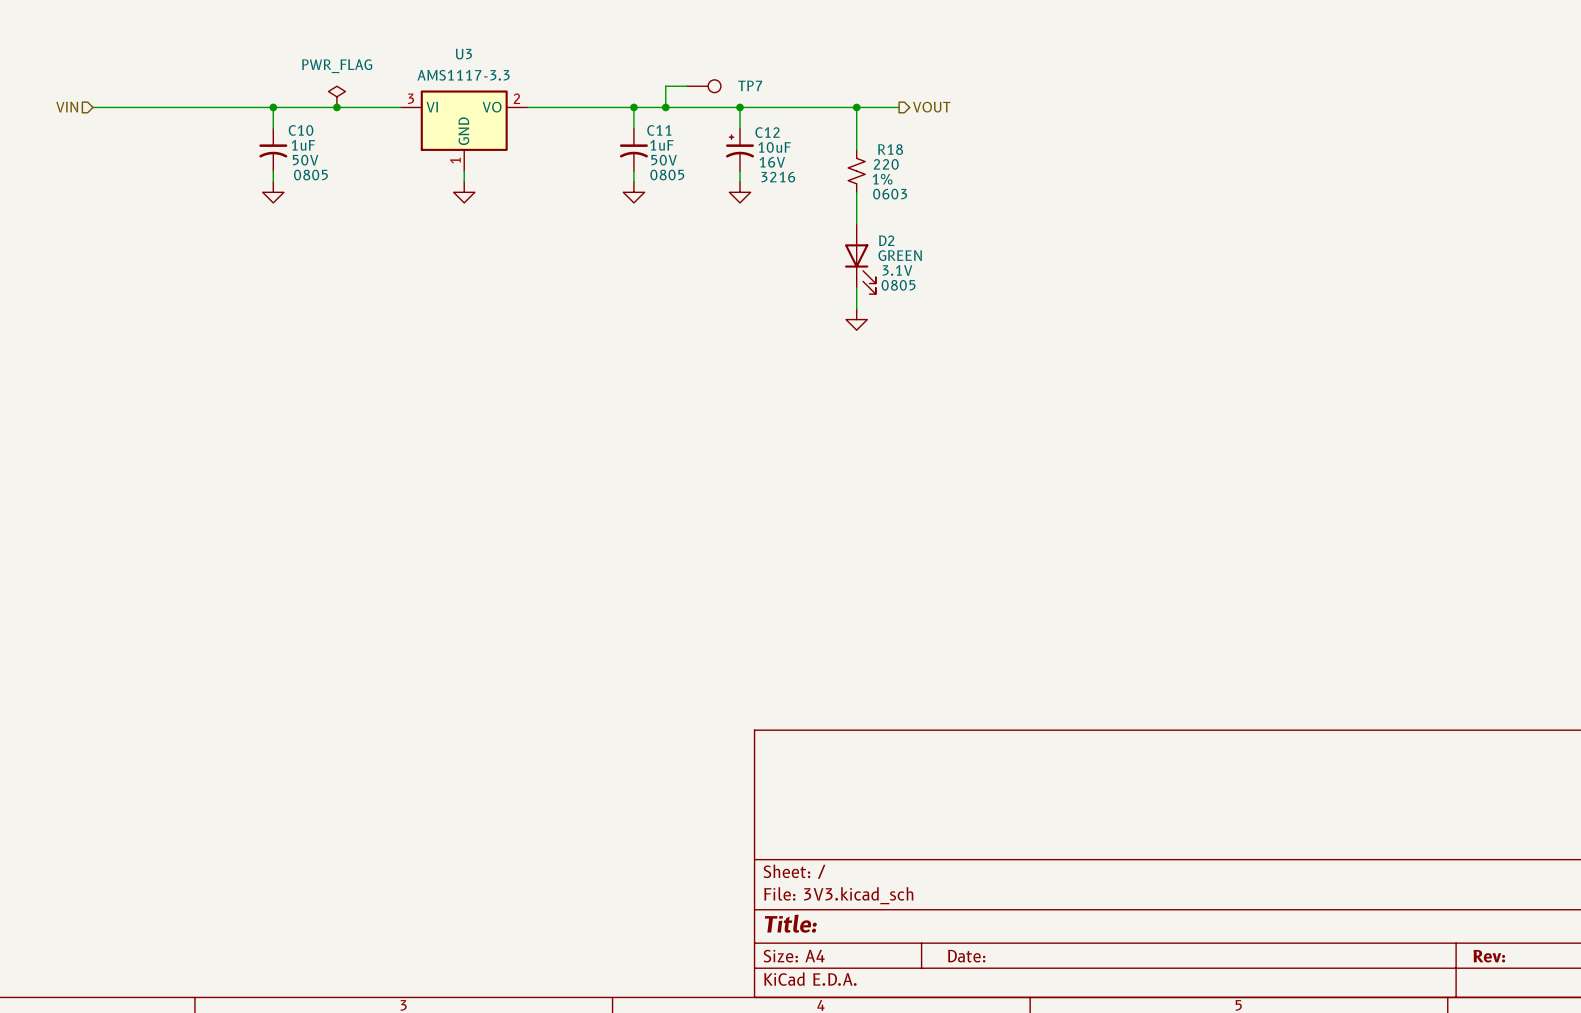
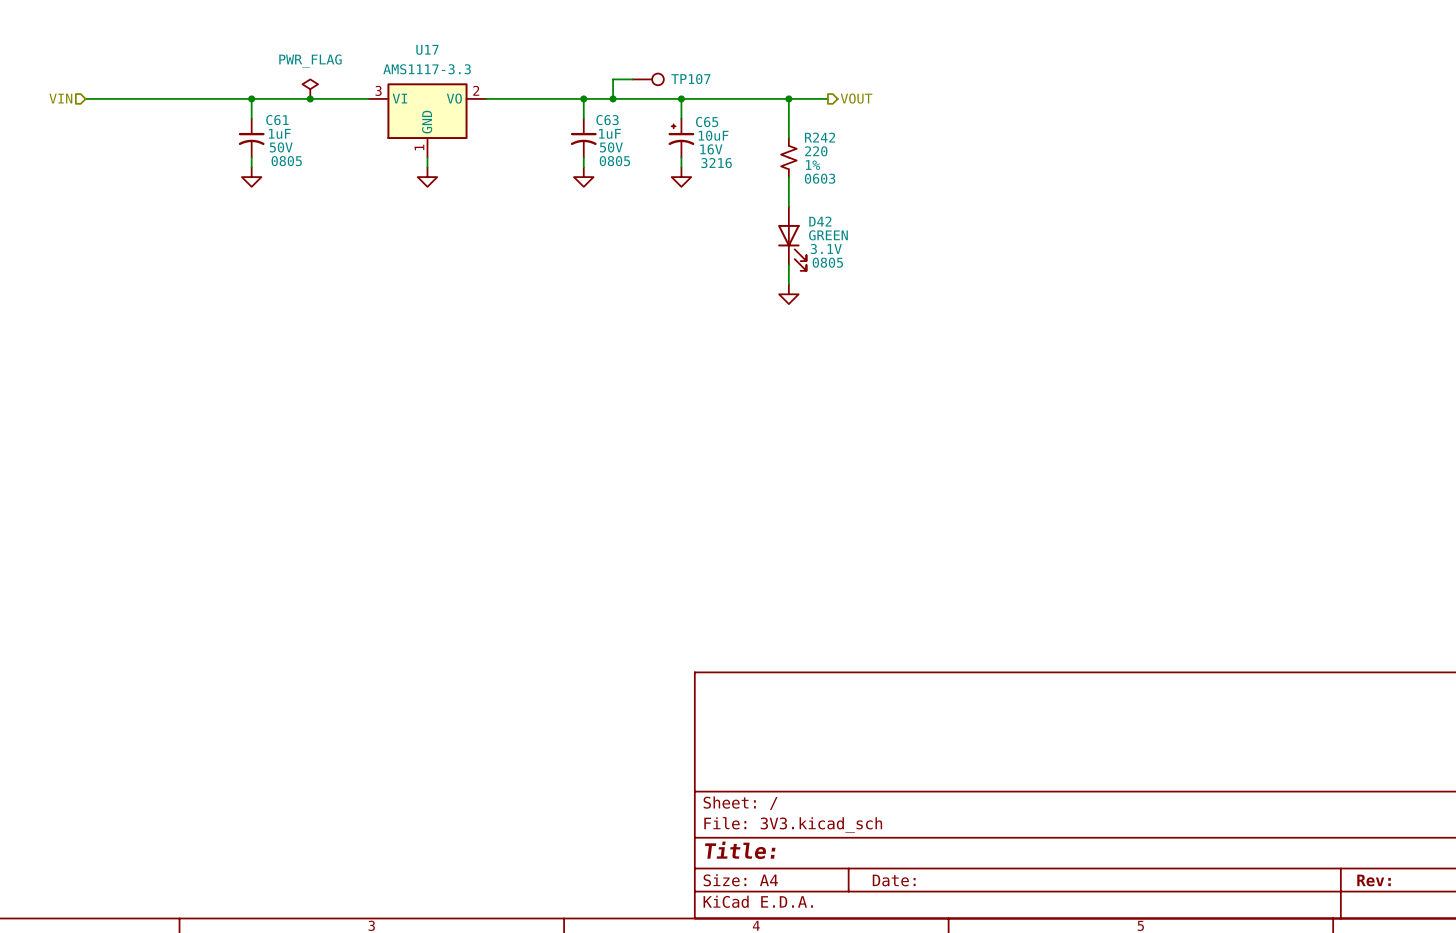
U3 name: U3 (463, 54) -> U17 (427, 49)
TP7 name: TP7 (750, 85) -> TP107 (690, 79)
C10 name: C10 (301, 130) -> C61 (277, 120)
C11 name: C11 (659, 130) -> C63 (607, 120)
C12 name: C12 (767, 132) -> C65 (707, 122)
R18 name: R18 (890, 149) -> R242 (820, 137)
D2 name: D2 (886, 240) -> D42 (820, 221)

